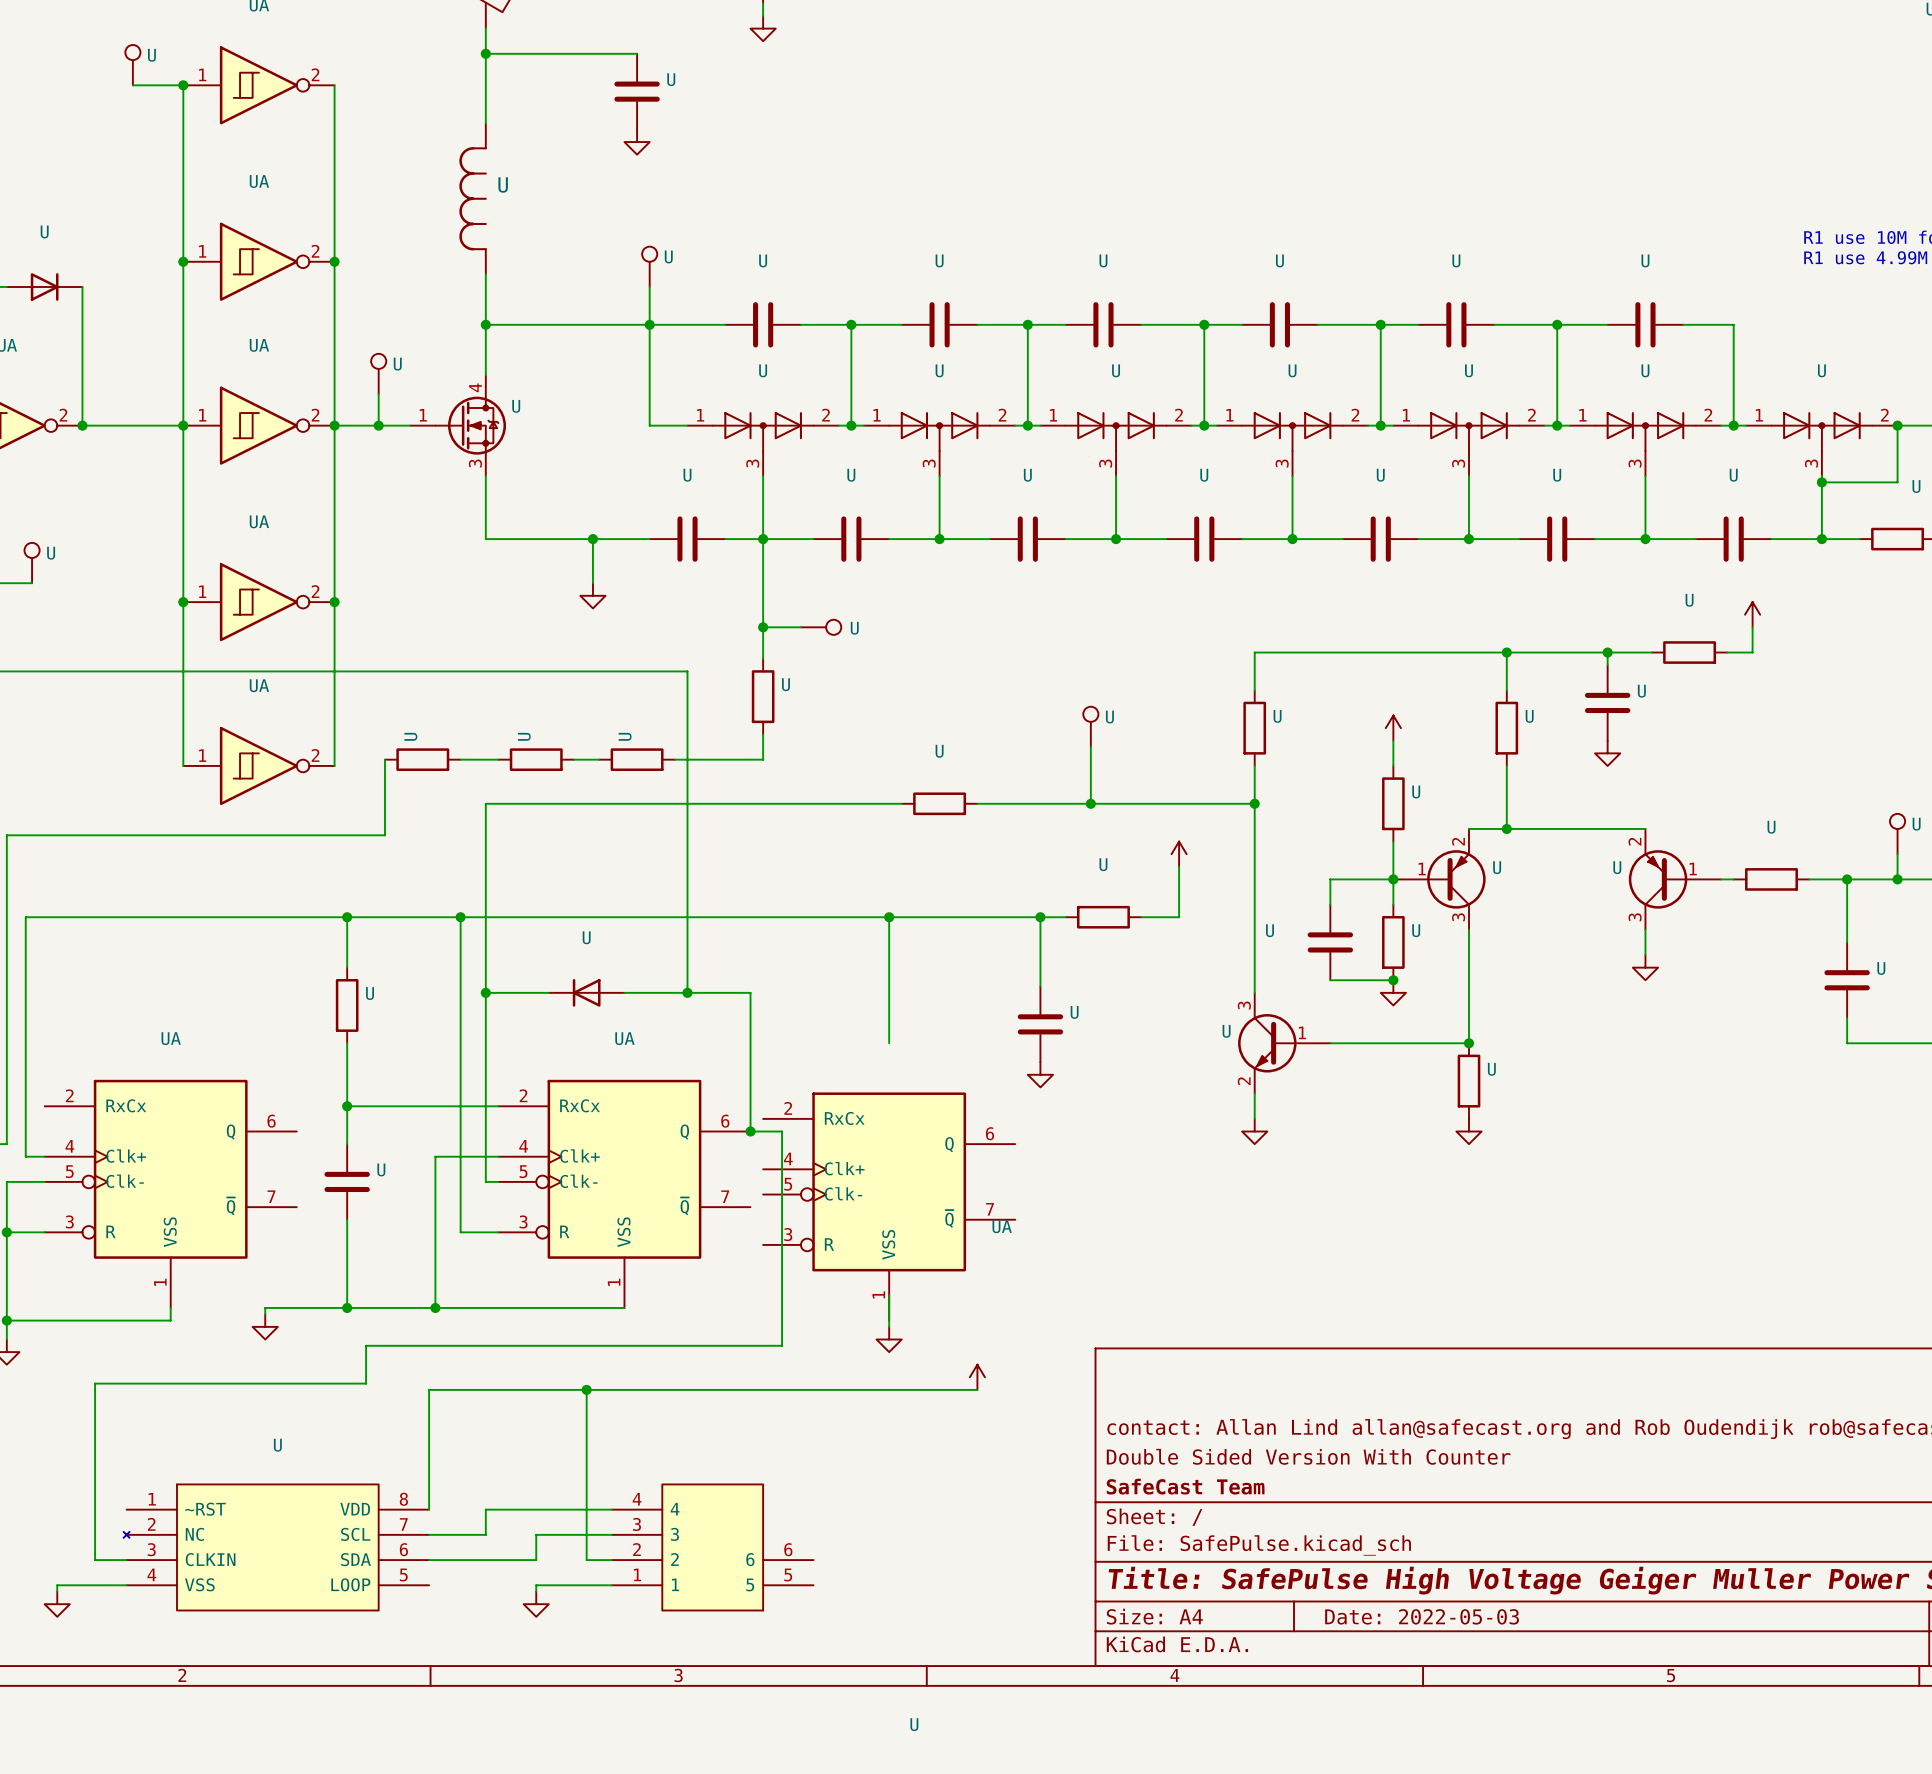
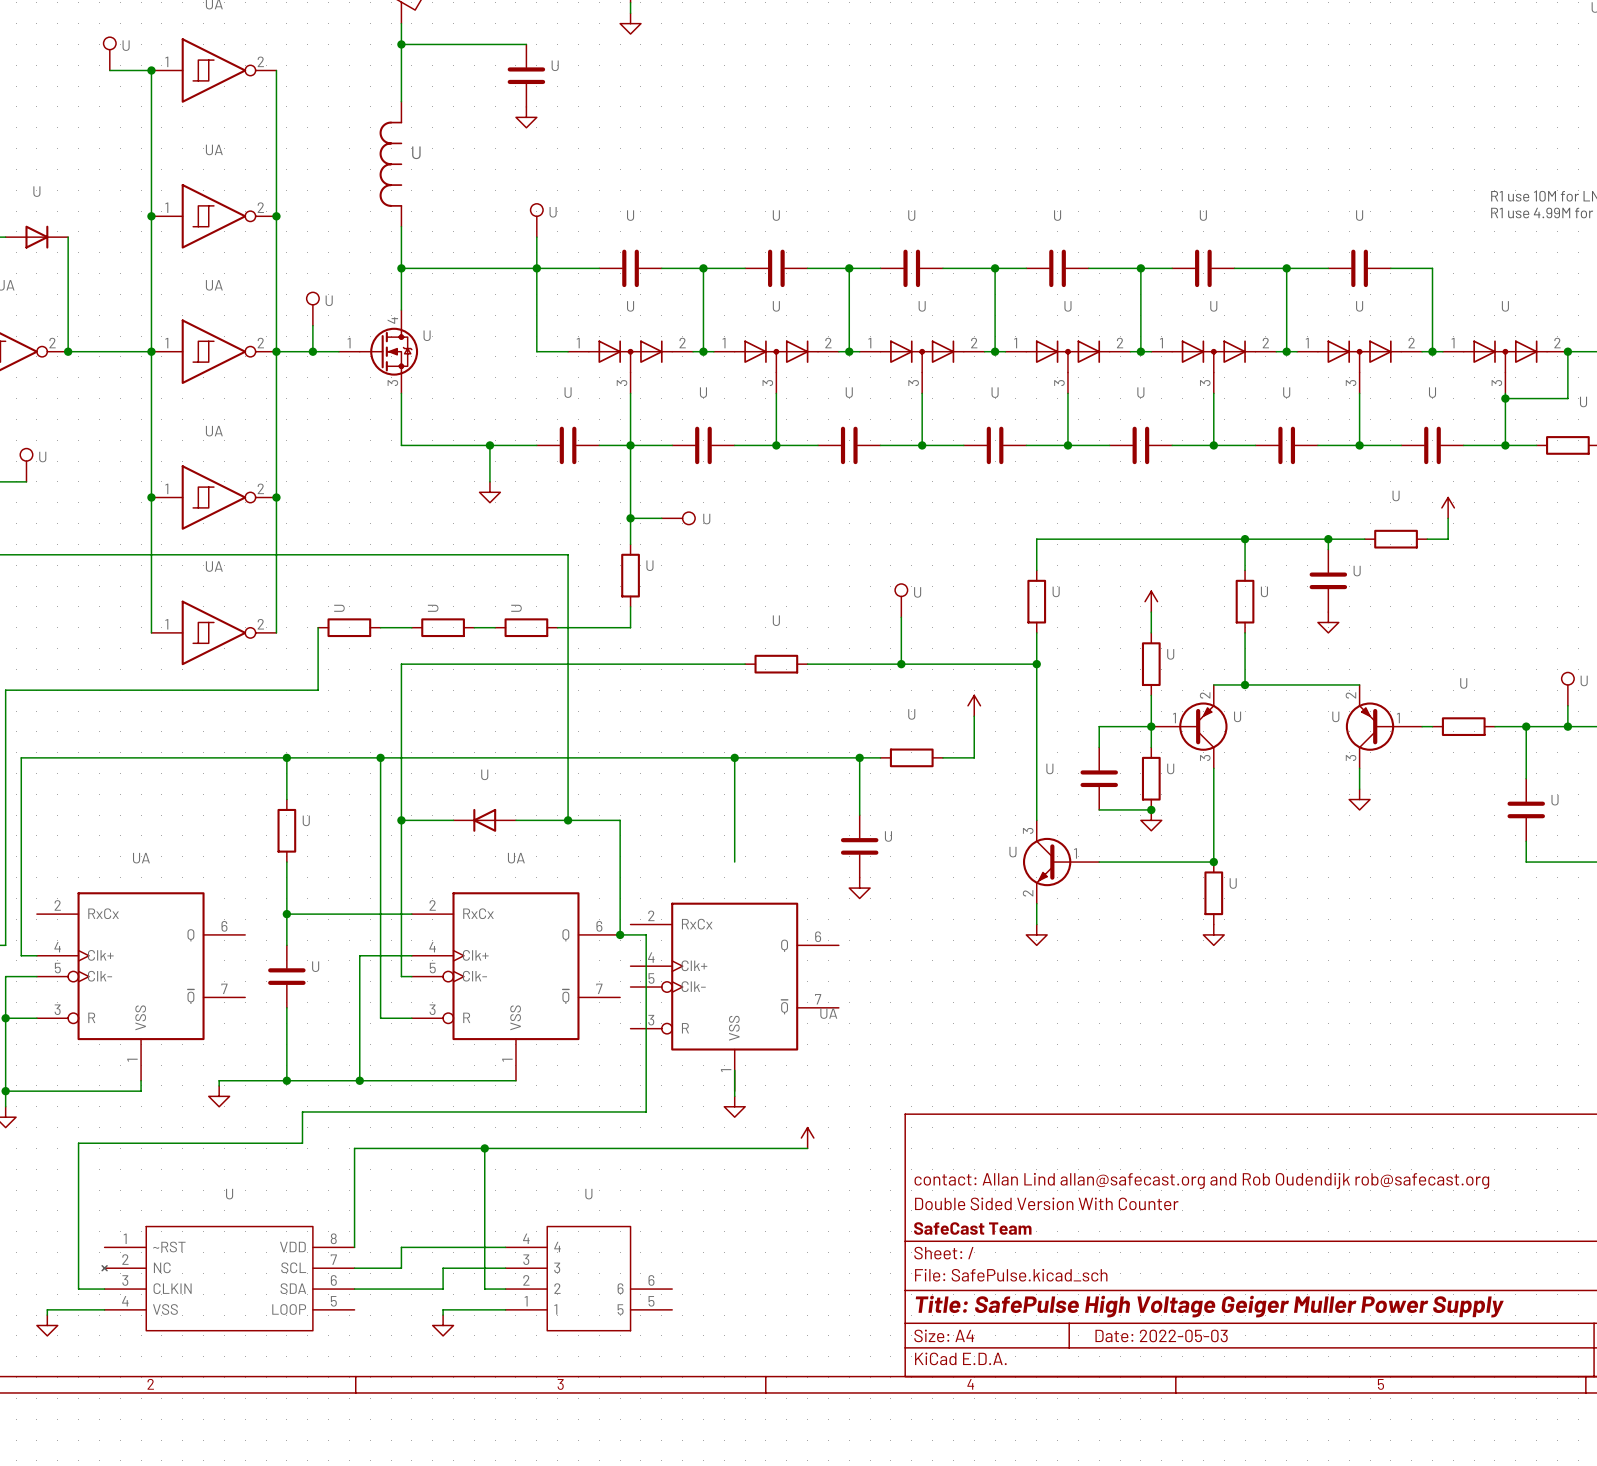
U symbol: [123, 1483, 430, 1612] -> [102, 1225, 355, 1332]
U symbol: [611, 1483, 814, 1612] -> [505, 1225, 673, 1332]
U name position: U (914, 1724) -> U (588, 1194)

